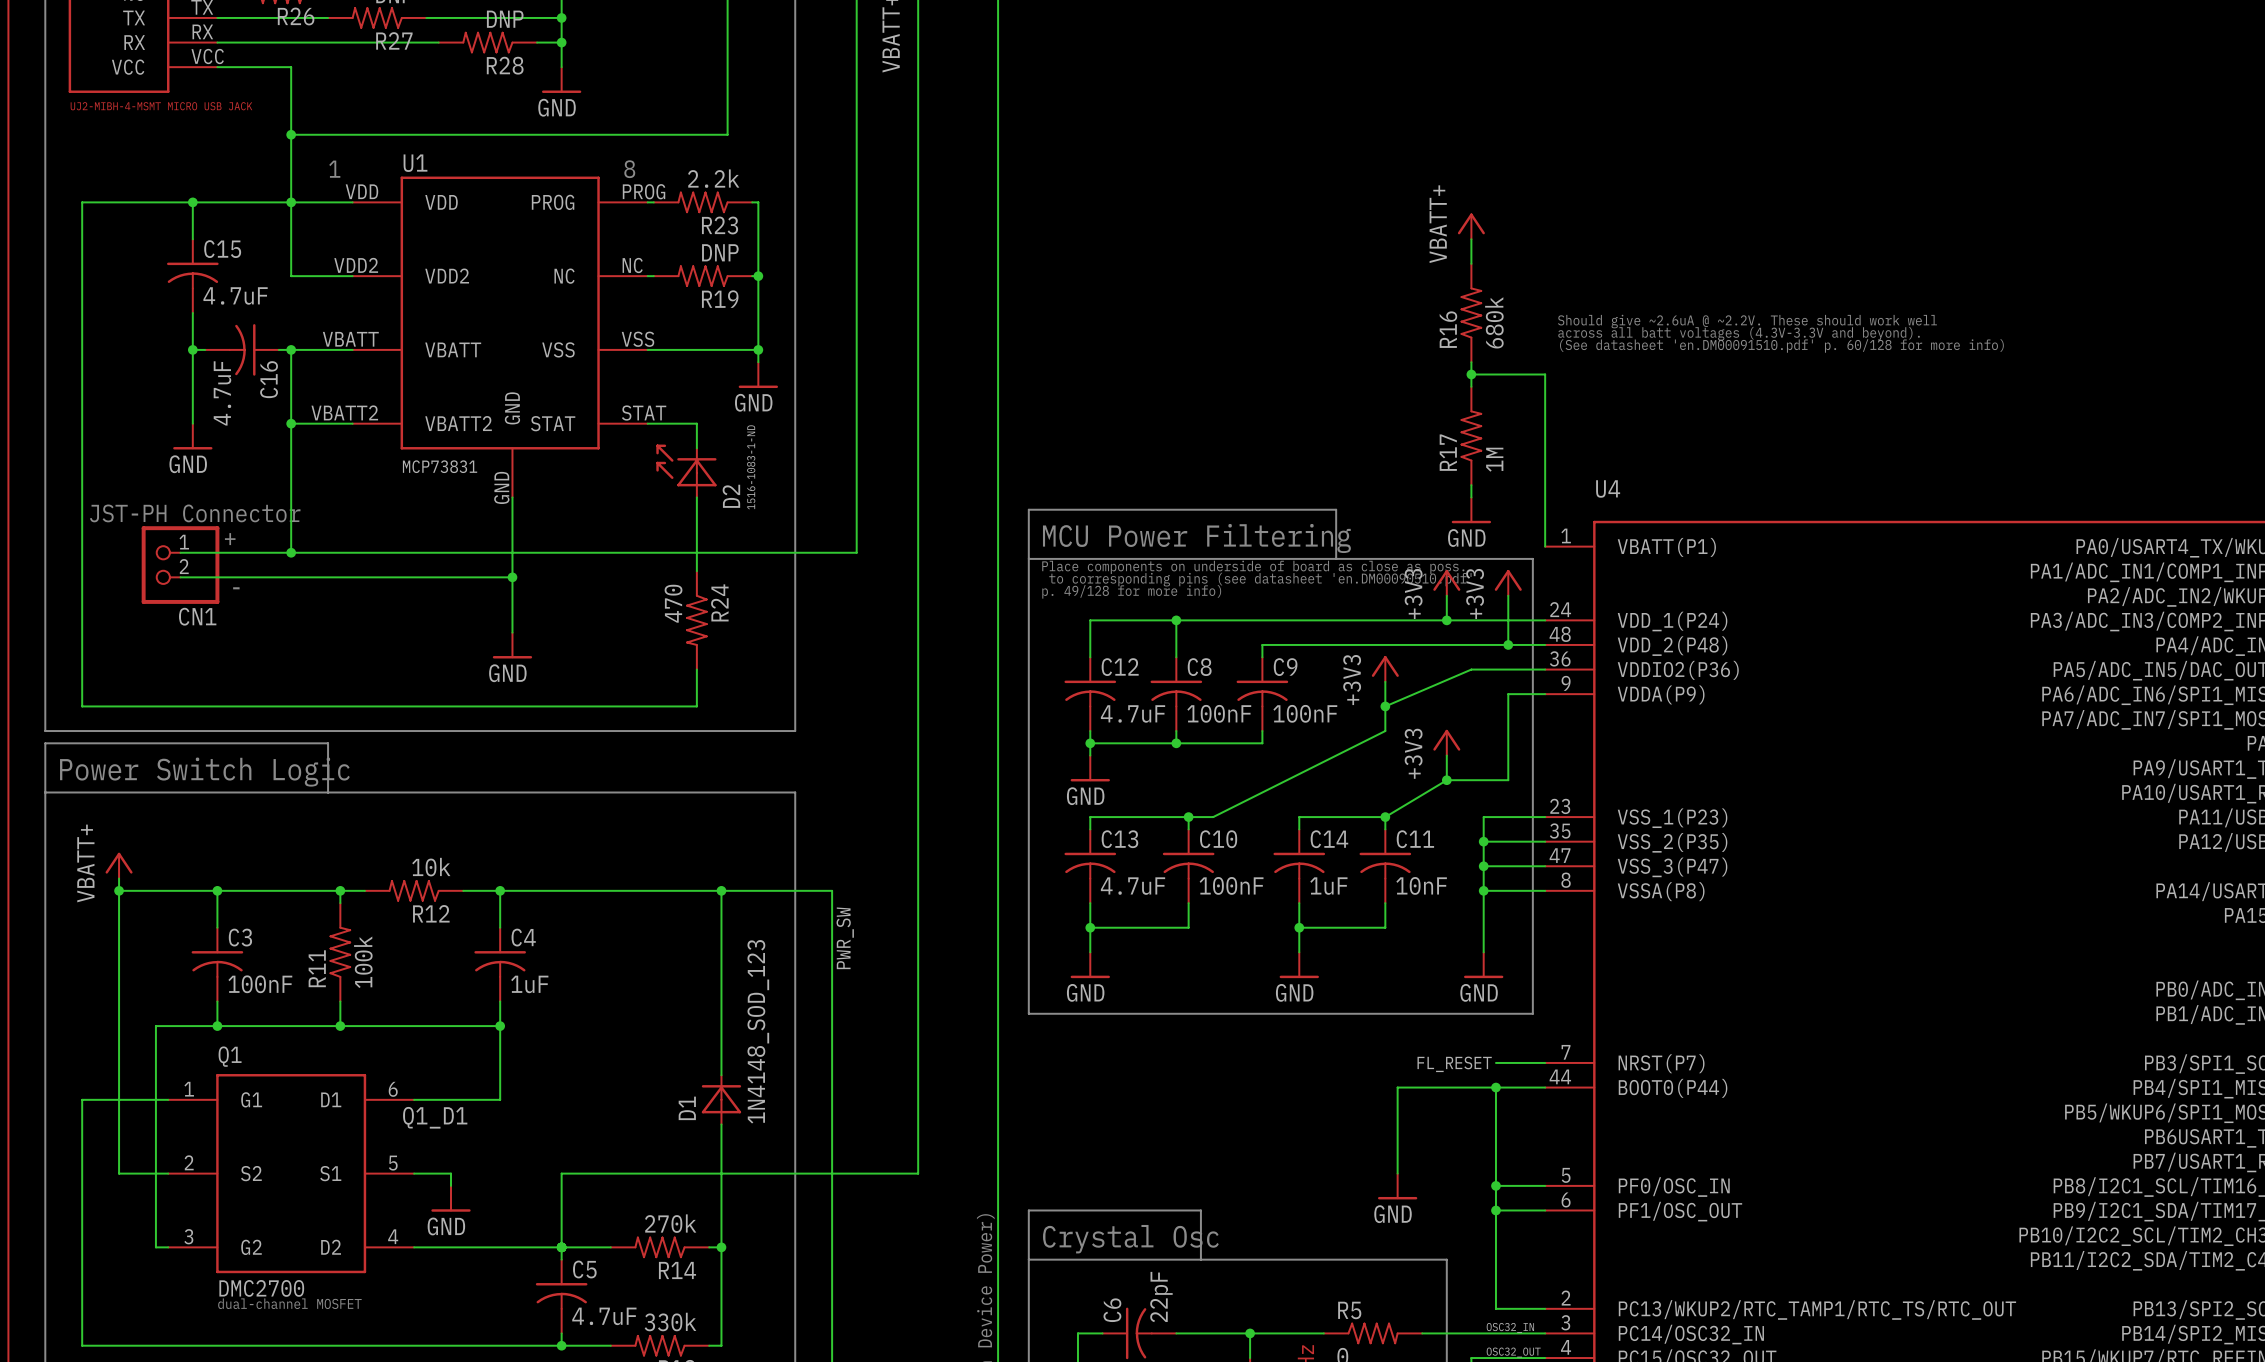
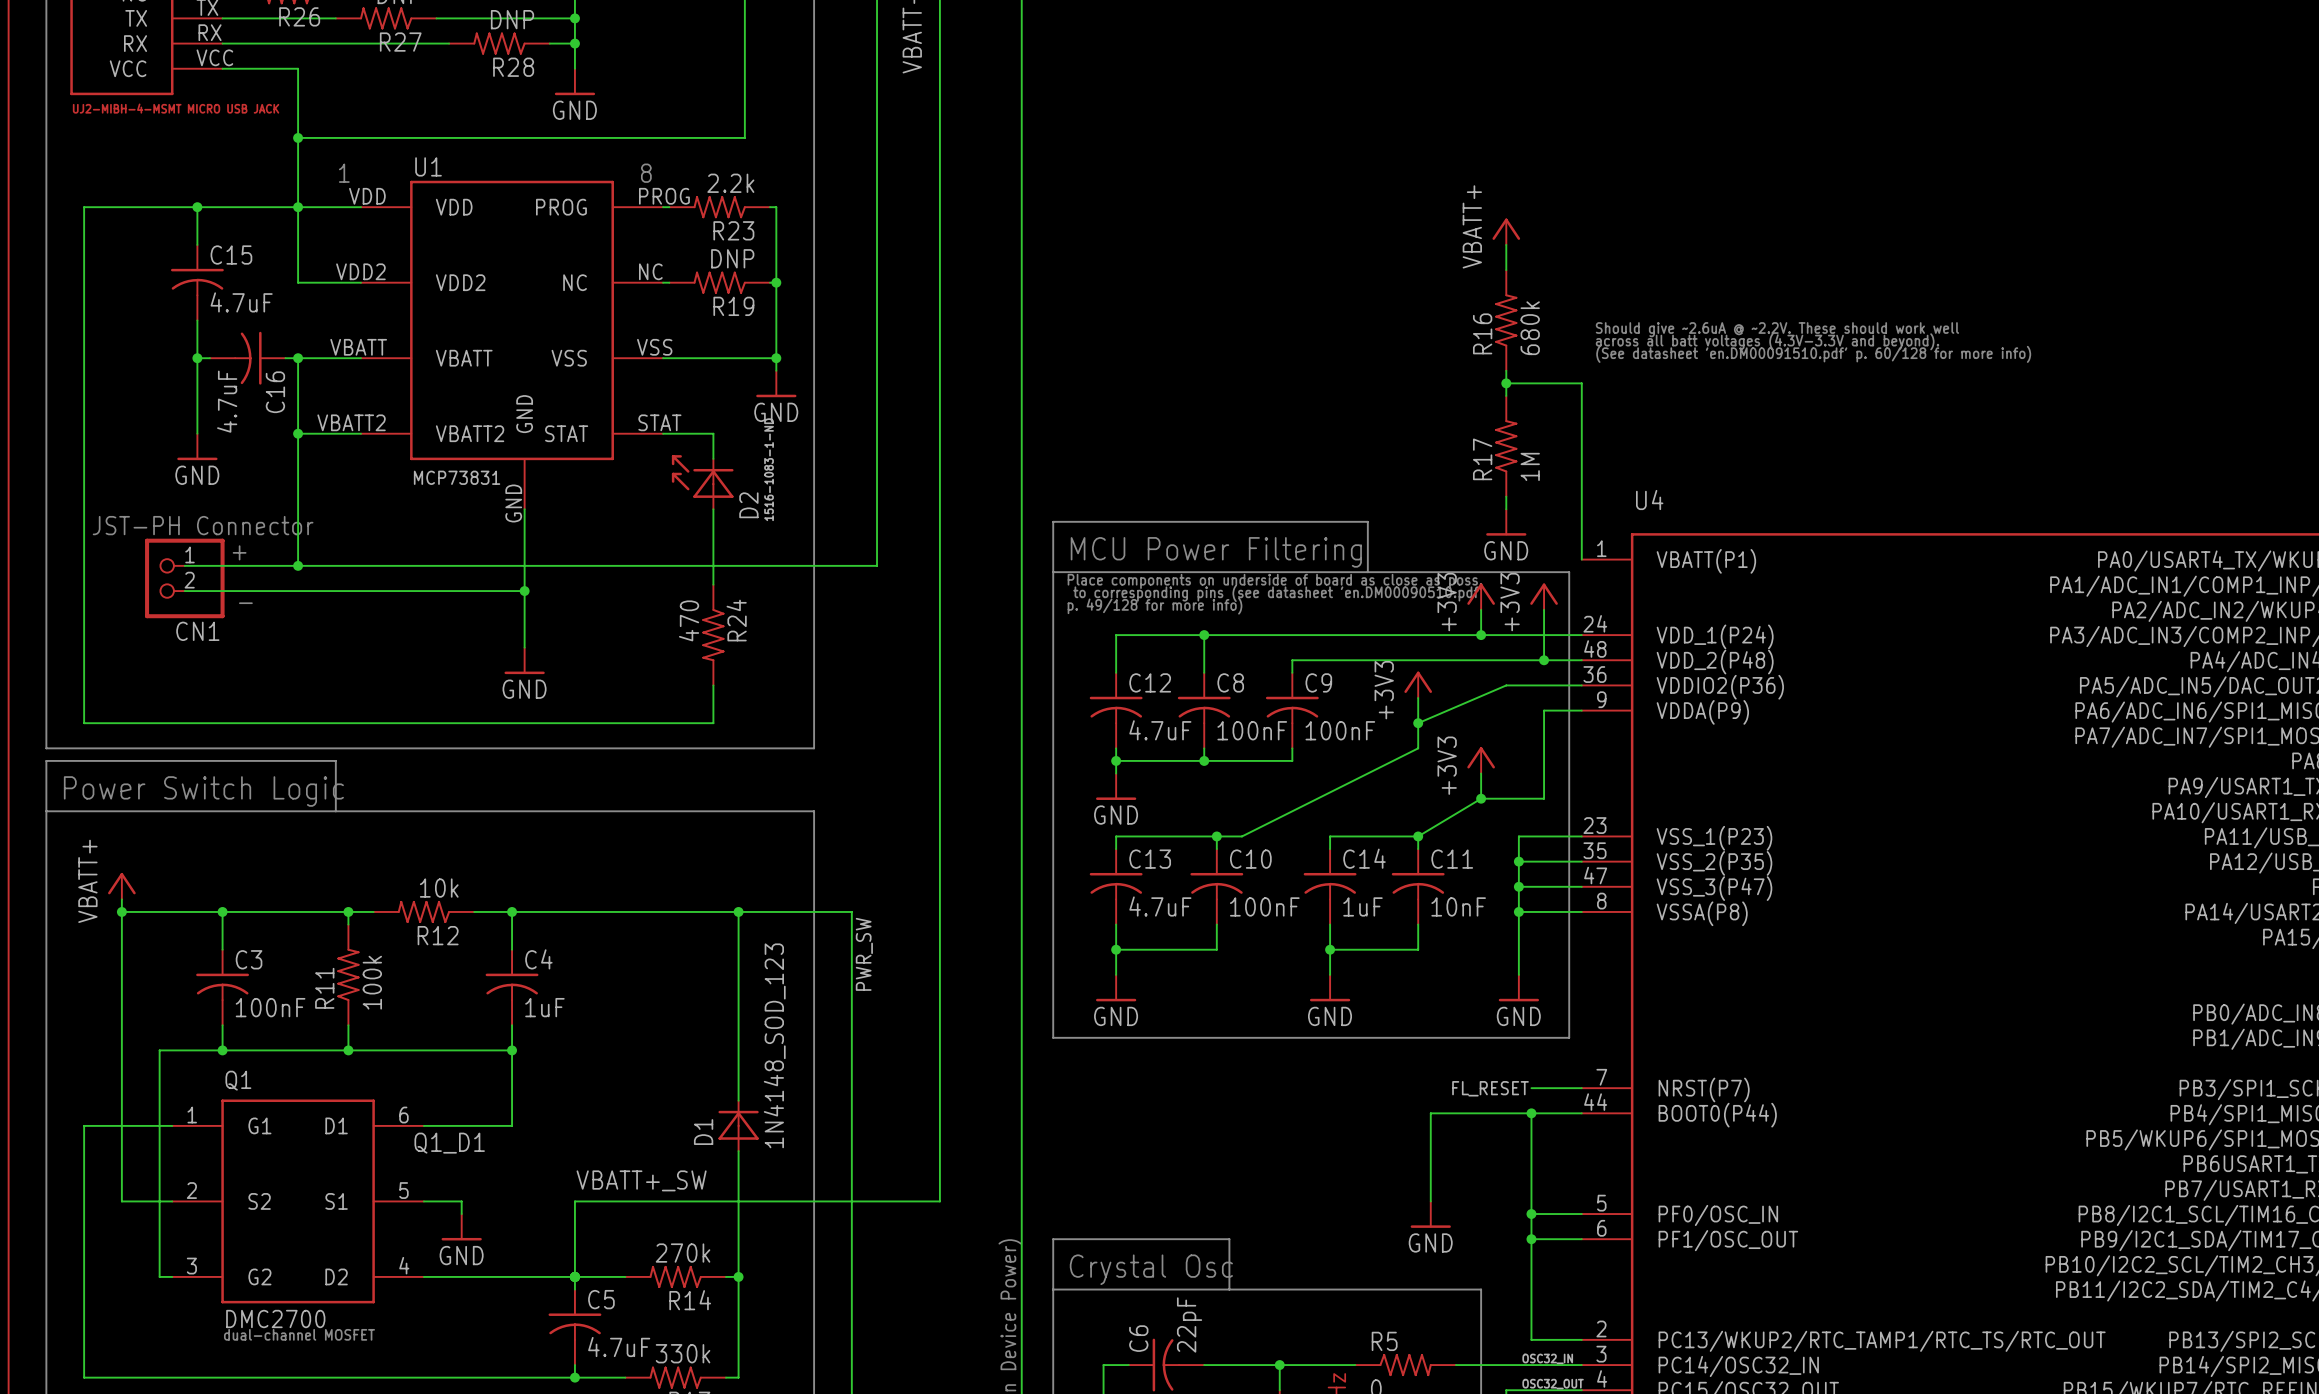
label: none -> VBATT+_SW (641, 1180)

